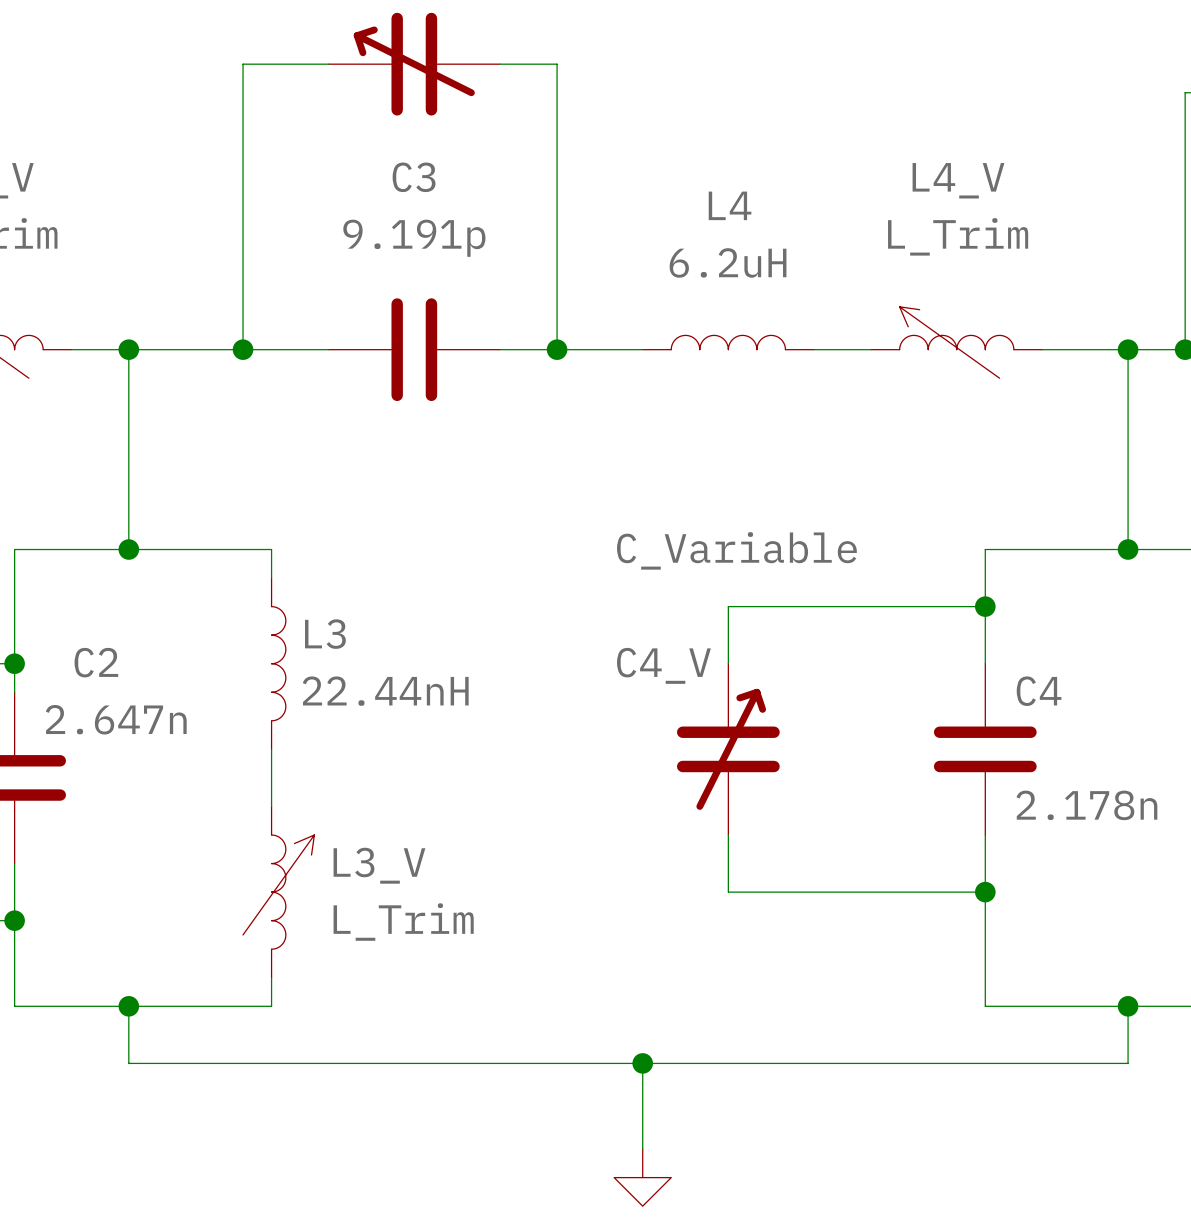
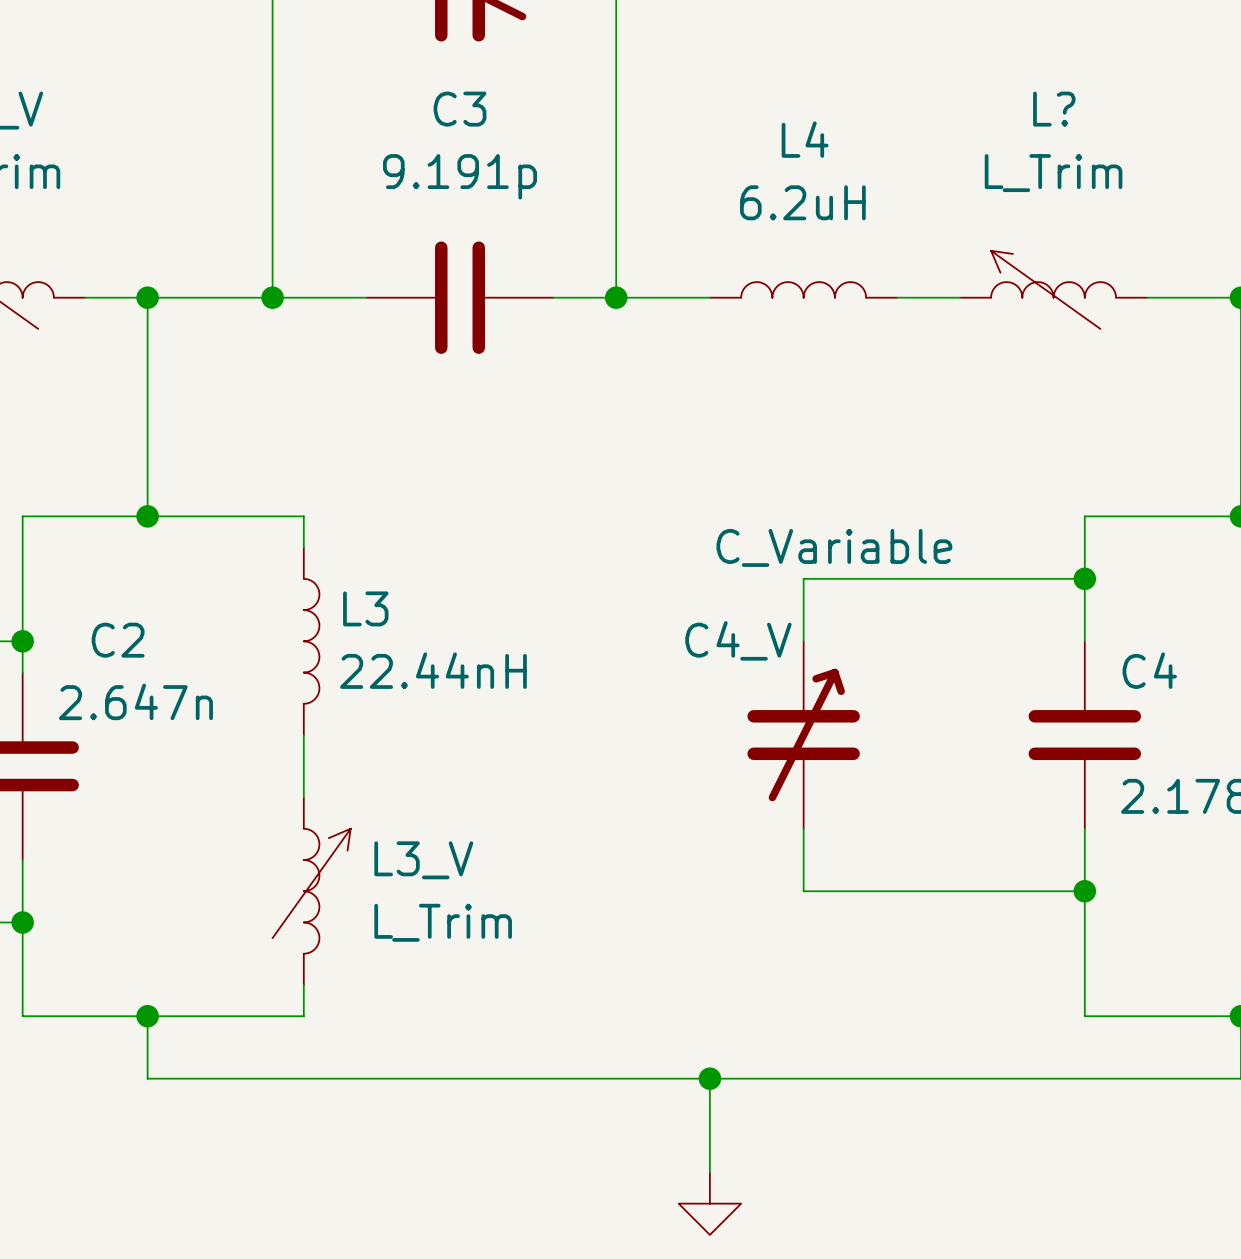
L4_V name: L4_V (958, 180) -> L? (1054, 109)
C4_V value position: C_Variable (736, 550) -> C_Variable (834, 547)

